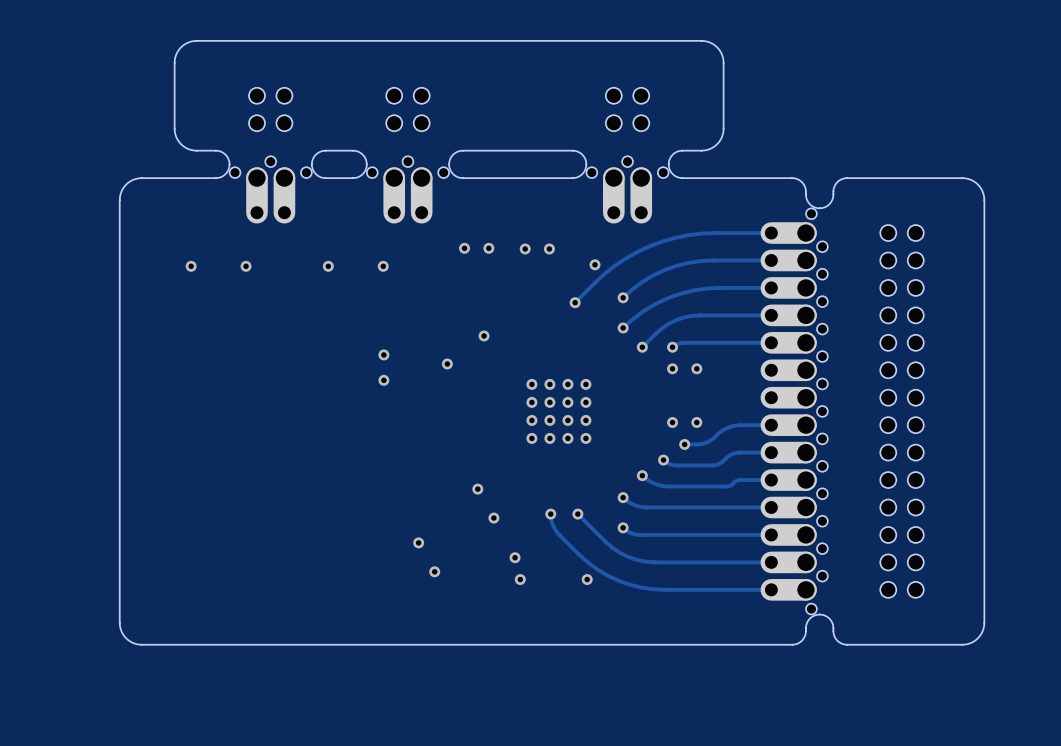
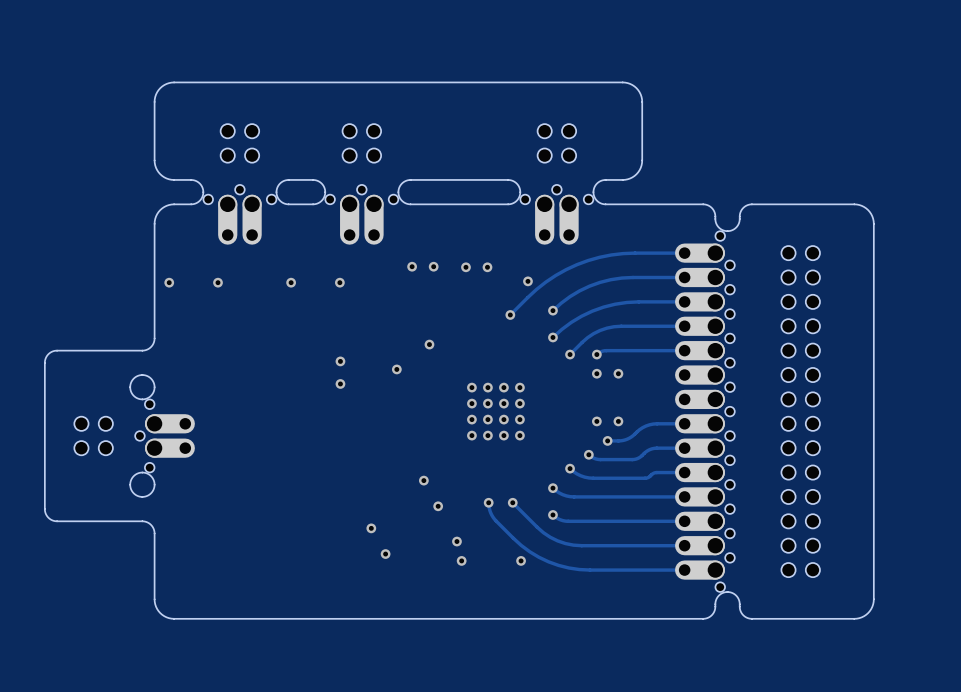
board edge: (196, 178) (136, 178) (124, 186) (119, 200) (119, 625) (126, 638) (136, 643) (196, 644) -> (174, 204) (160, 210) (154, 221) (154, 338) (151, 346) (142, 350) (55, 350) (48, 354) (44, 362) (46, 514) (50, 519) (55, 521) (142, 521) (149, 523) (154, 532) (155, 604) (162, 614) (174, 618)
board edge: none -> (142, 375) (151, 378) (154, 387) (151, 395) (142, 399) (133, 395) (130, 387) (133, 378) (142, 375)
part: none -> (169, 423)
part: none -> (93, 435)
part: none -> (144, 435)
part: none -> (169, 448)
board edge: none -> (142, 472) (151, 476) (154, 484) (151, 493) (142, 496) (133, 493) (130, 484) (133, 476) (142, 472)

